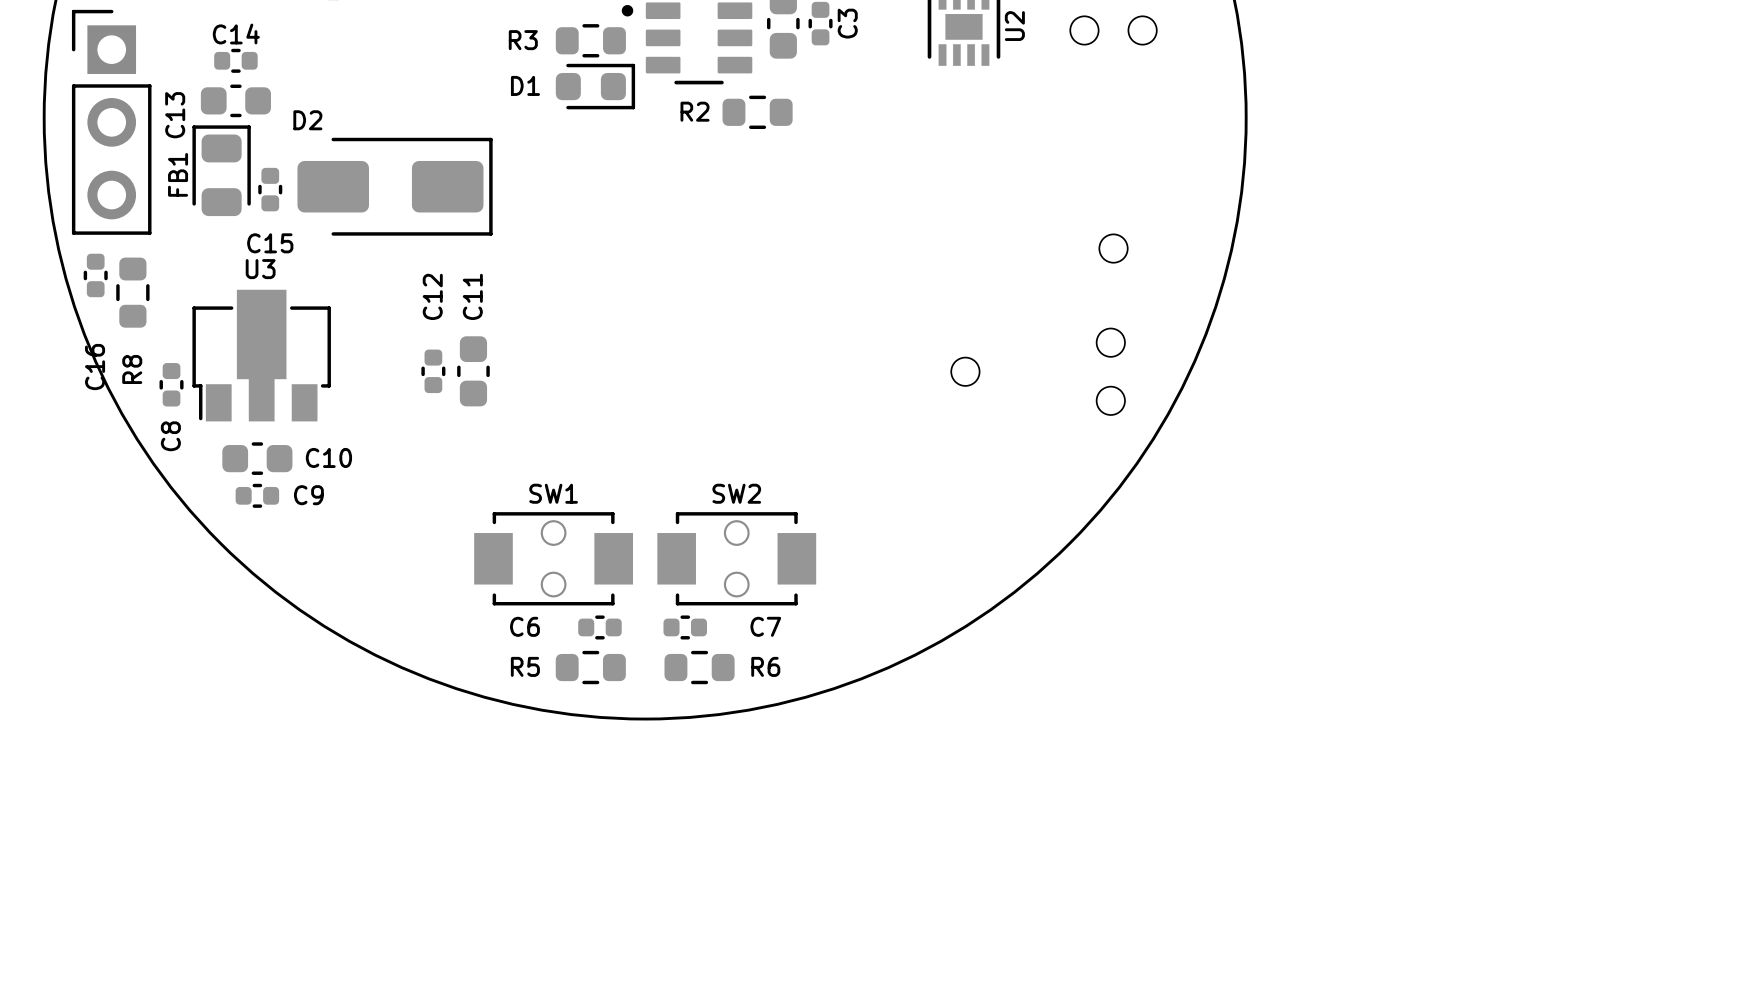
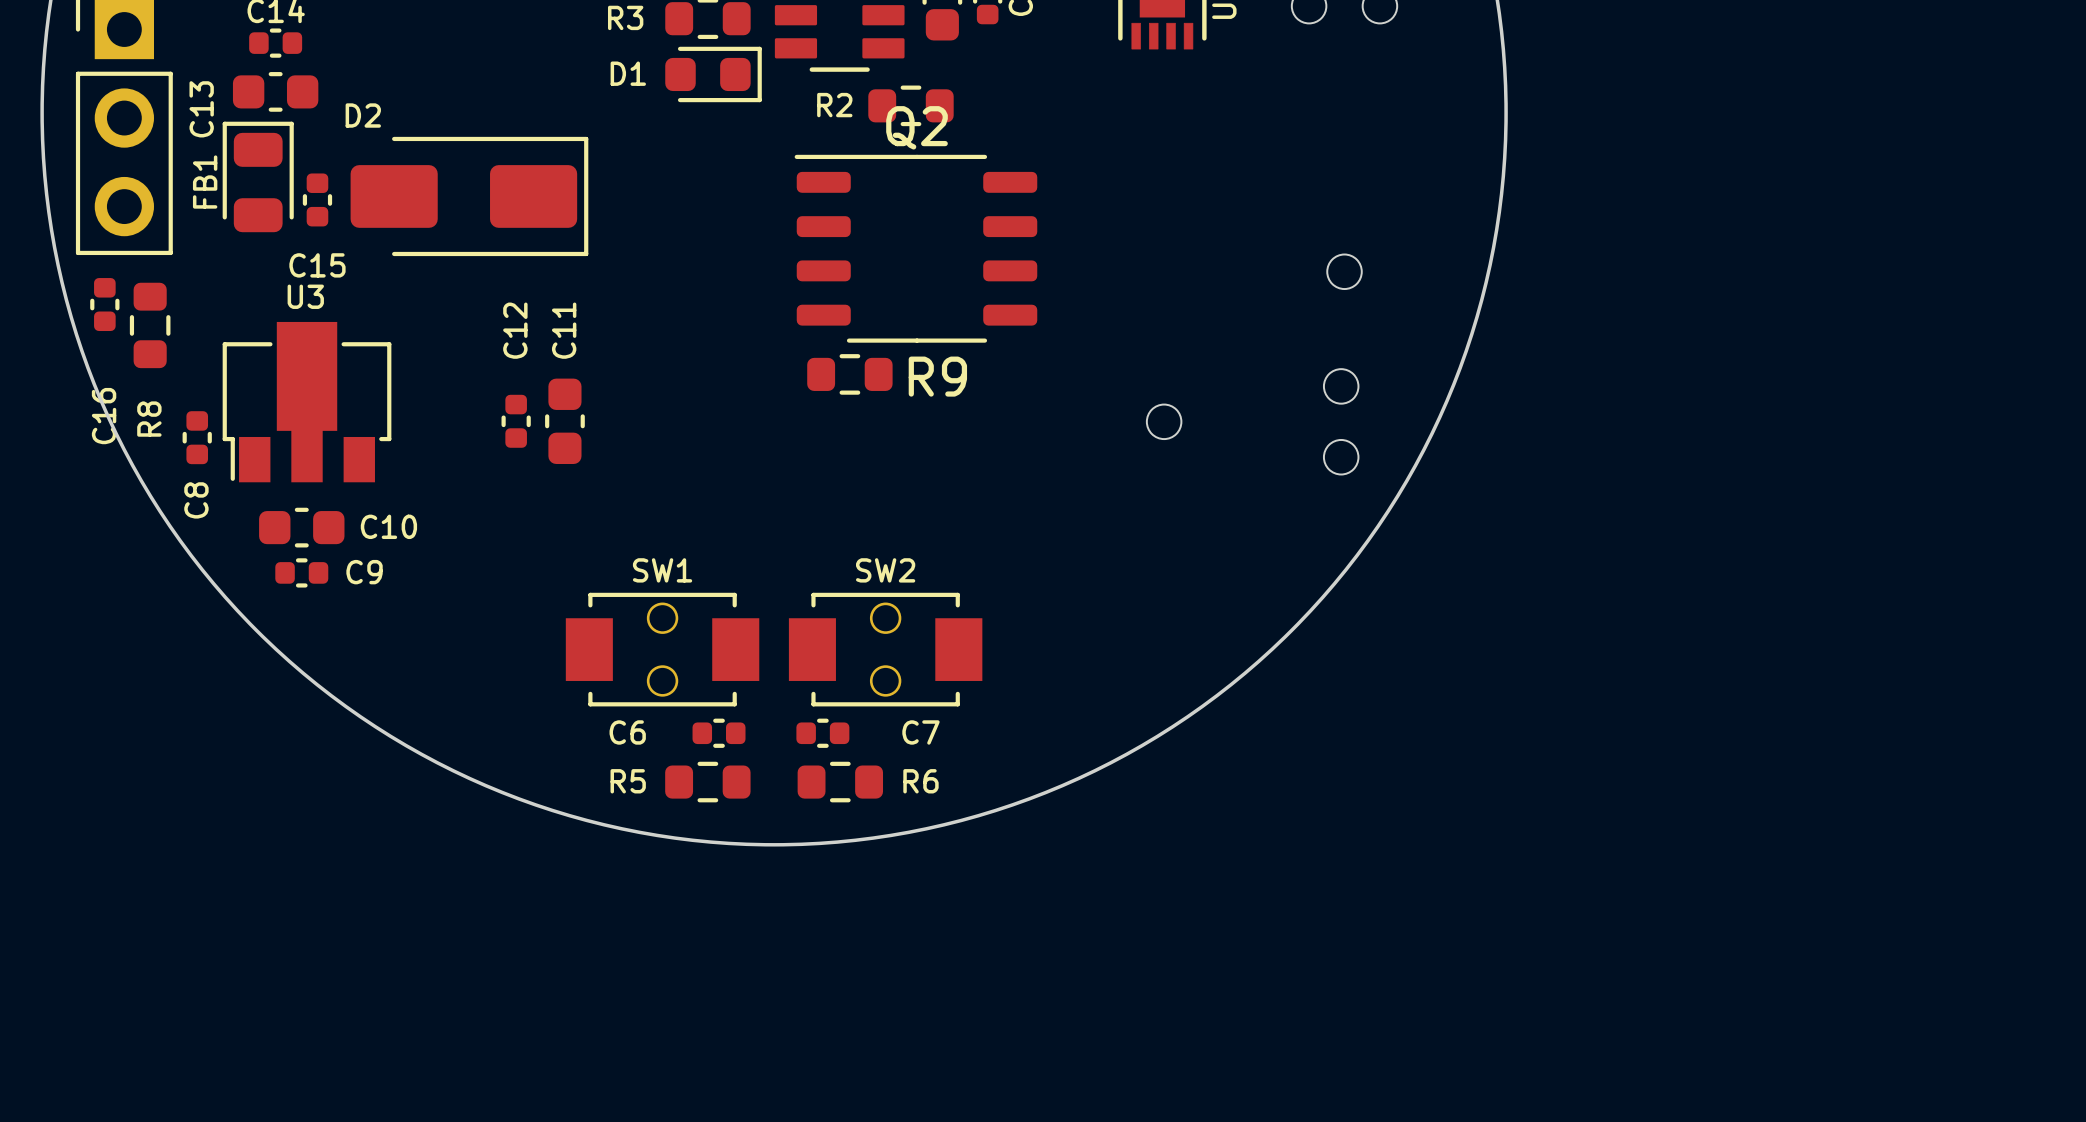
Q2: none -> (915, 248)
R9: none -> (849, 374)

